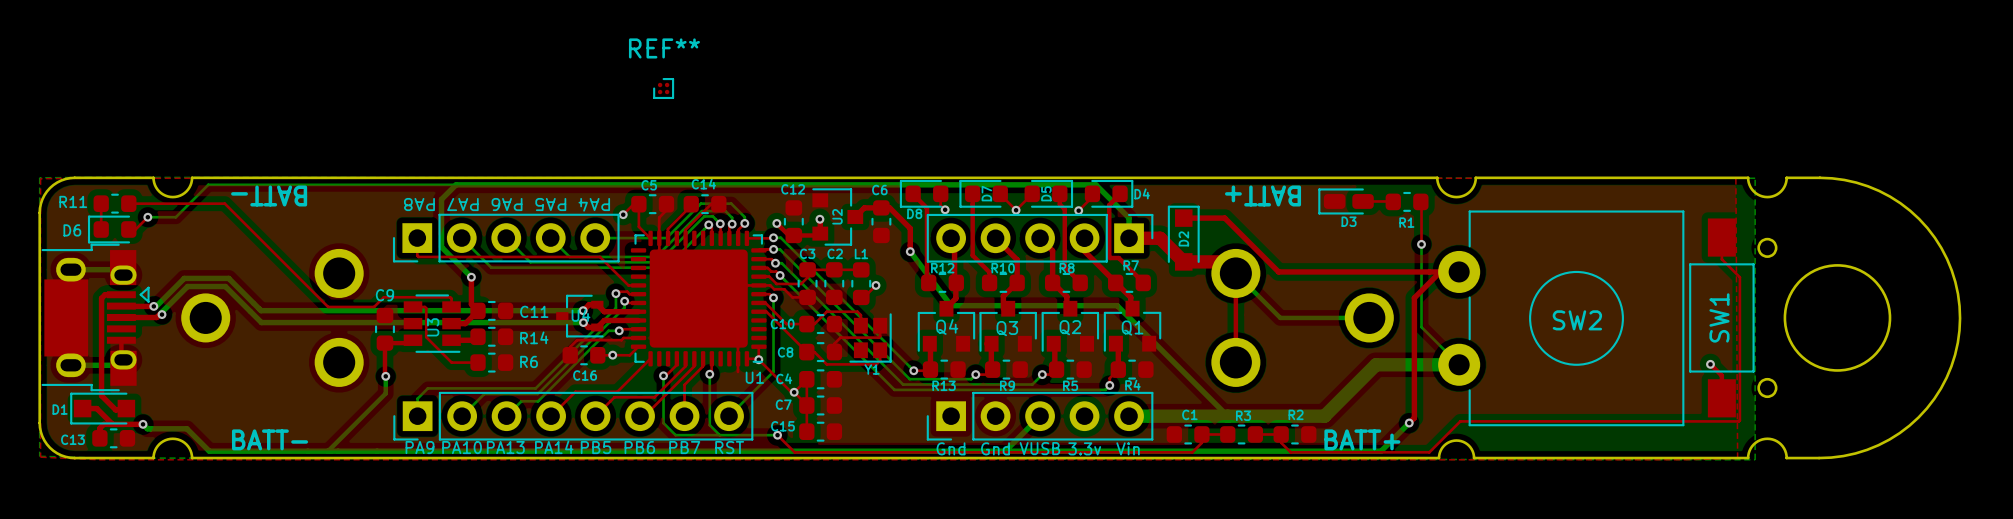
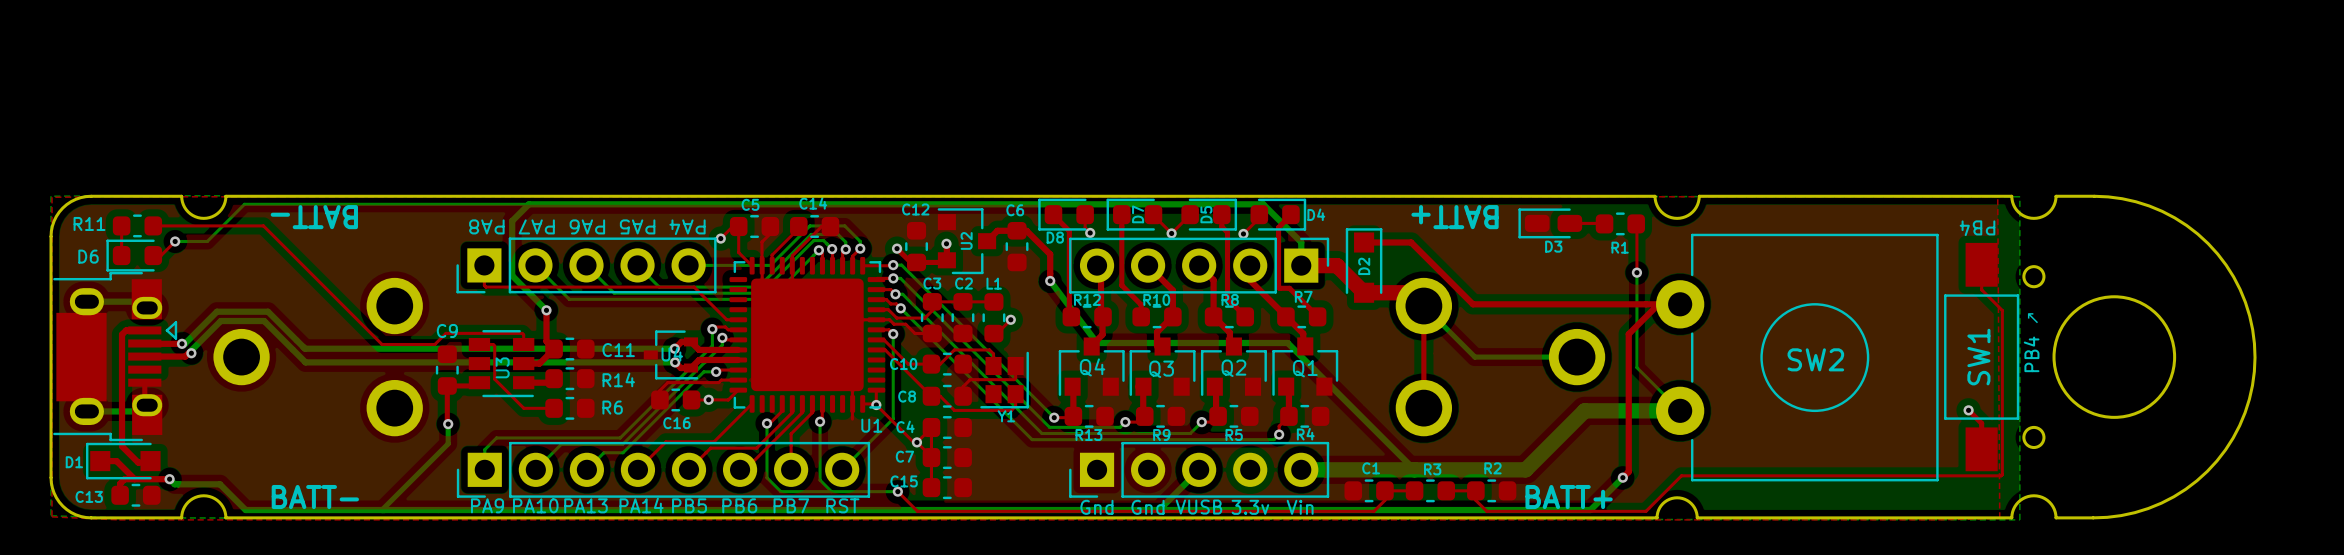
REF**: (663, 88) -> none
text: none -> PB4 (1977, 228)
text: none -> PB4 ↗ (2031, 342)

